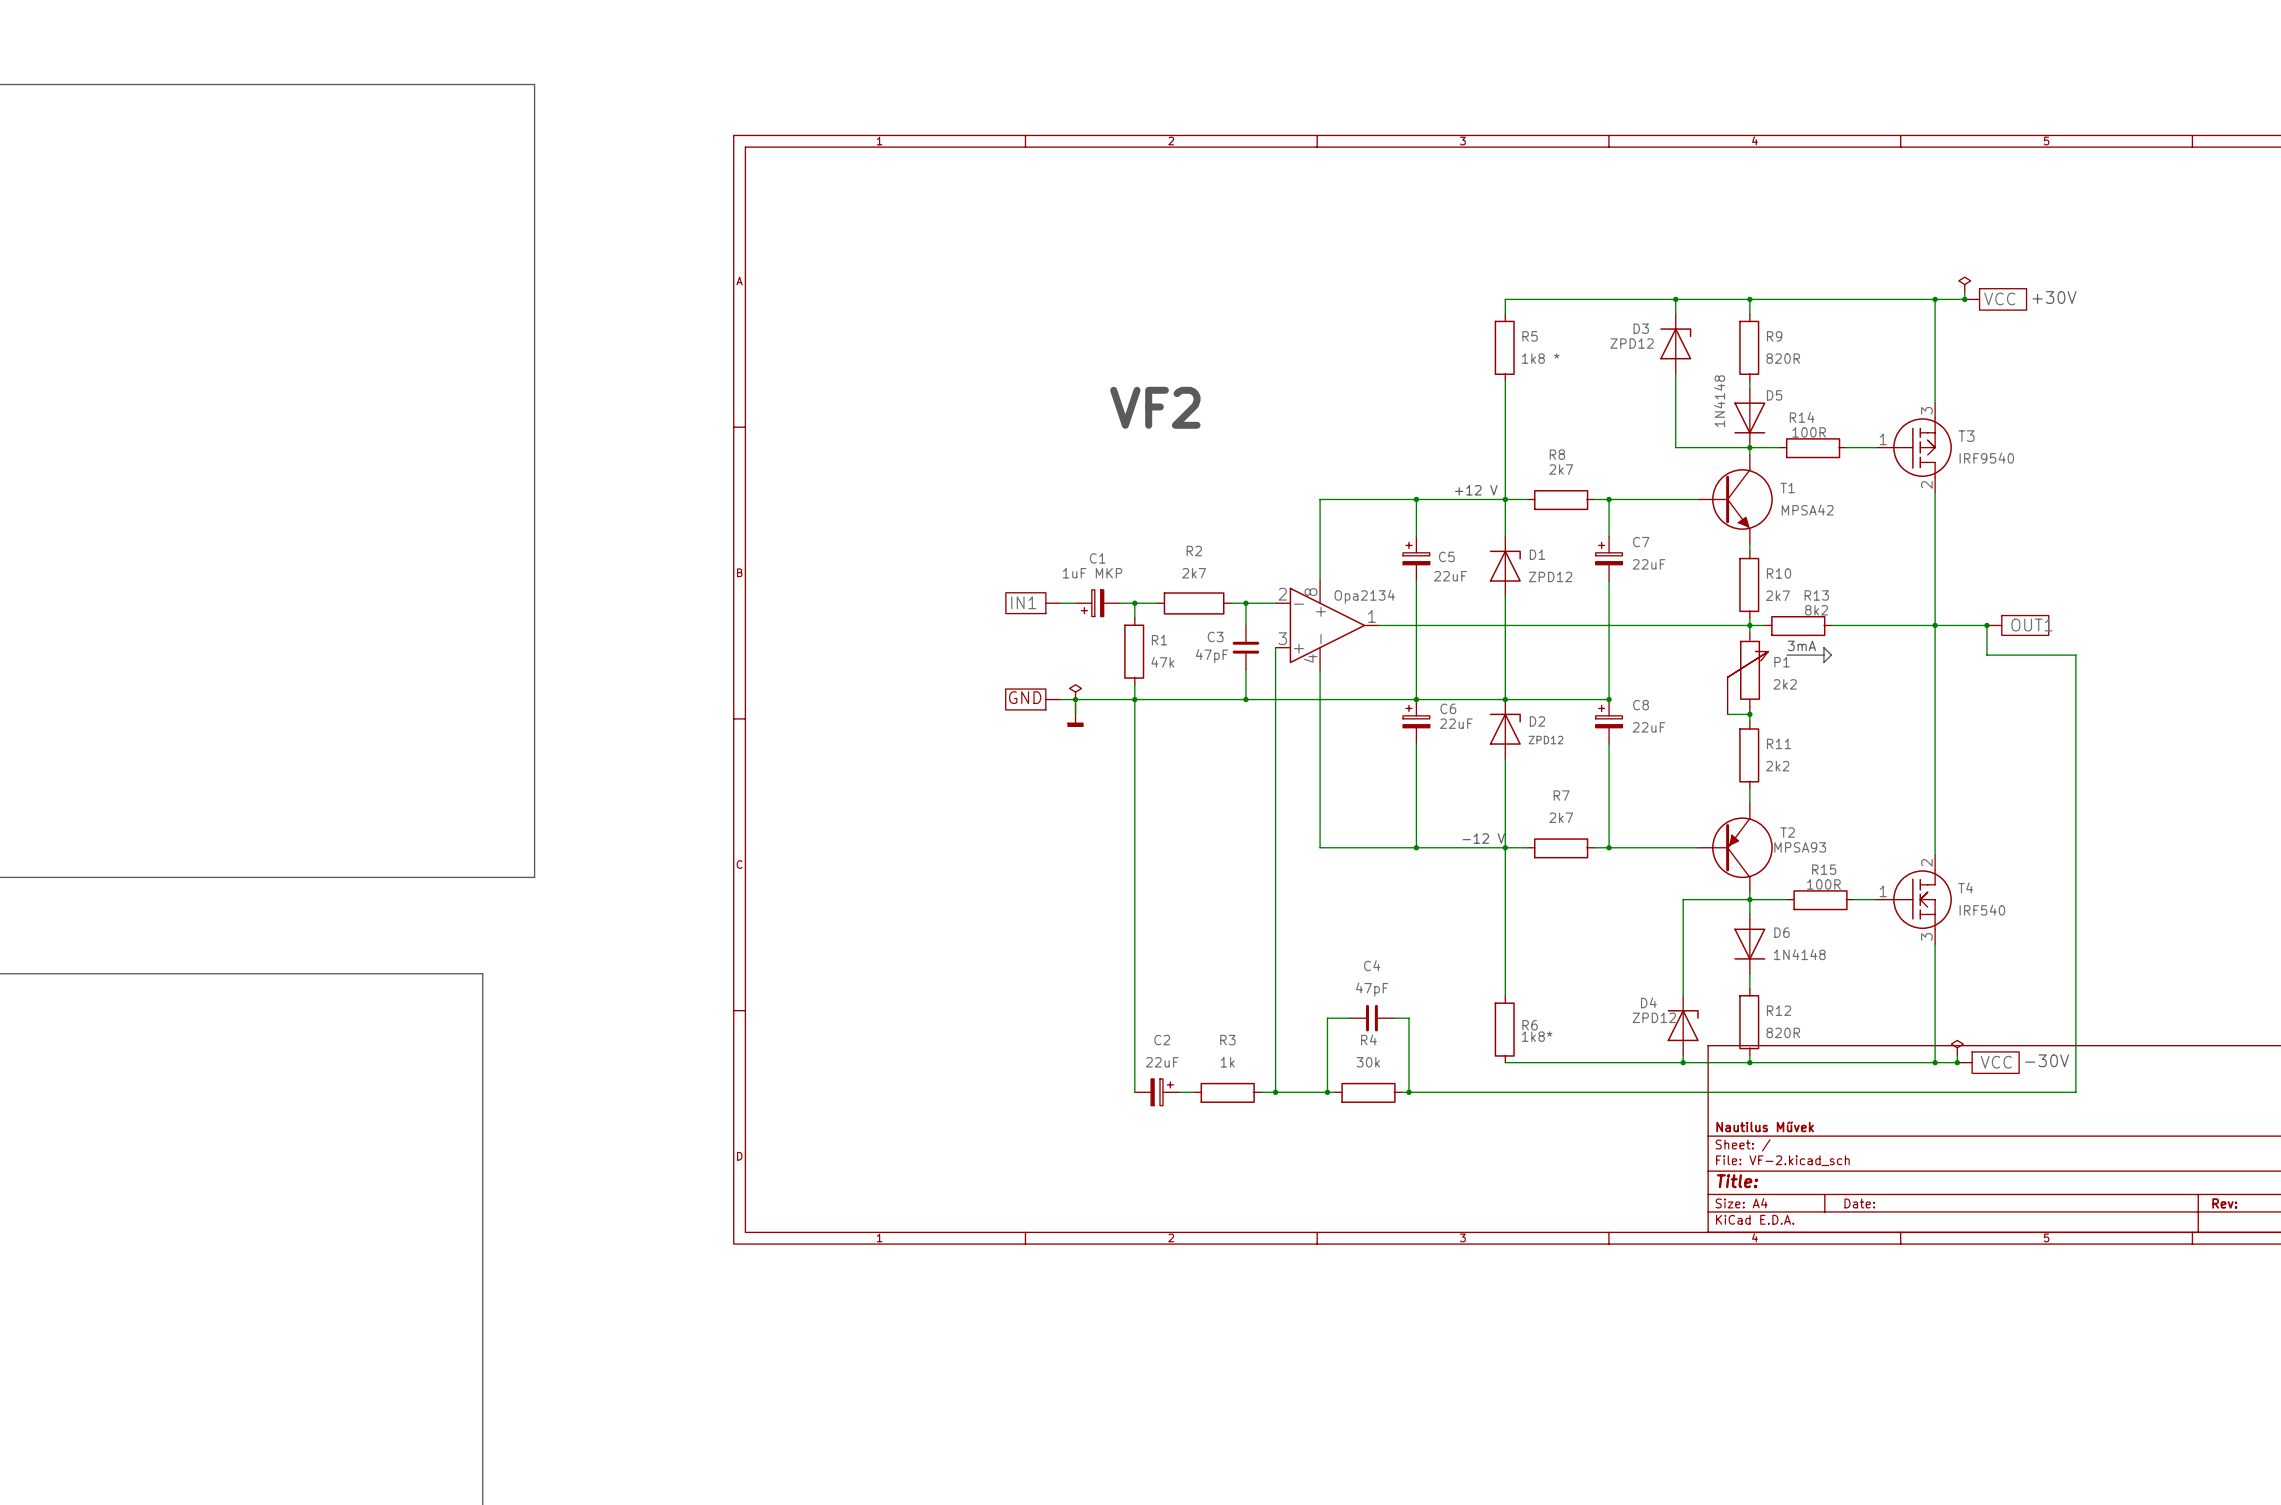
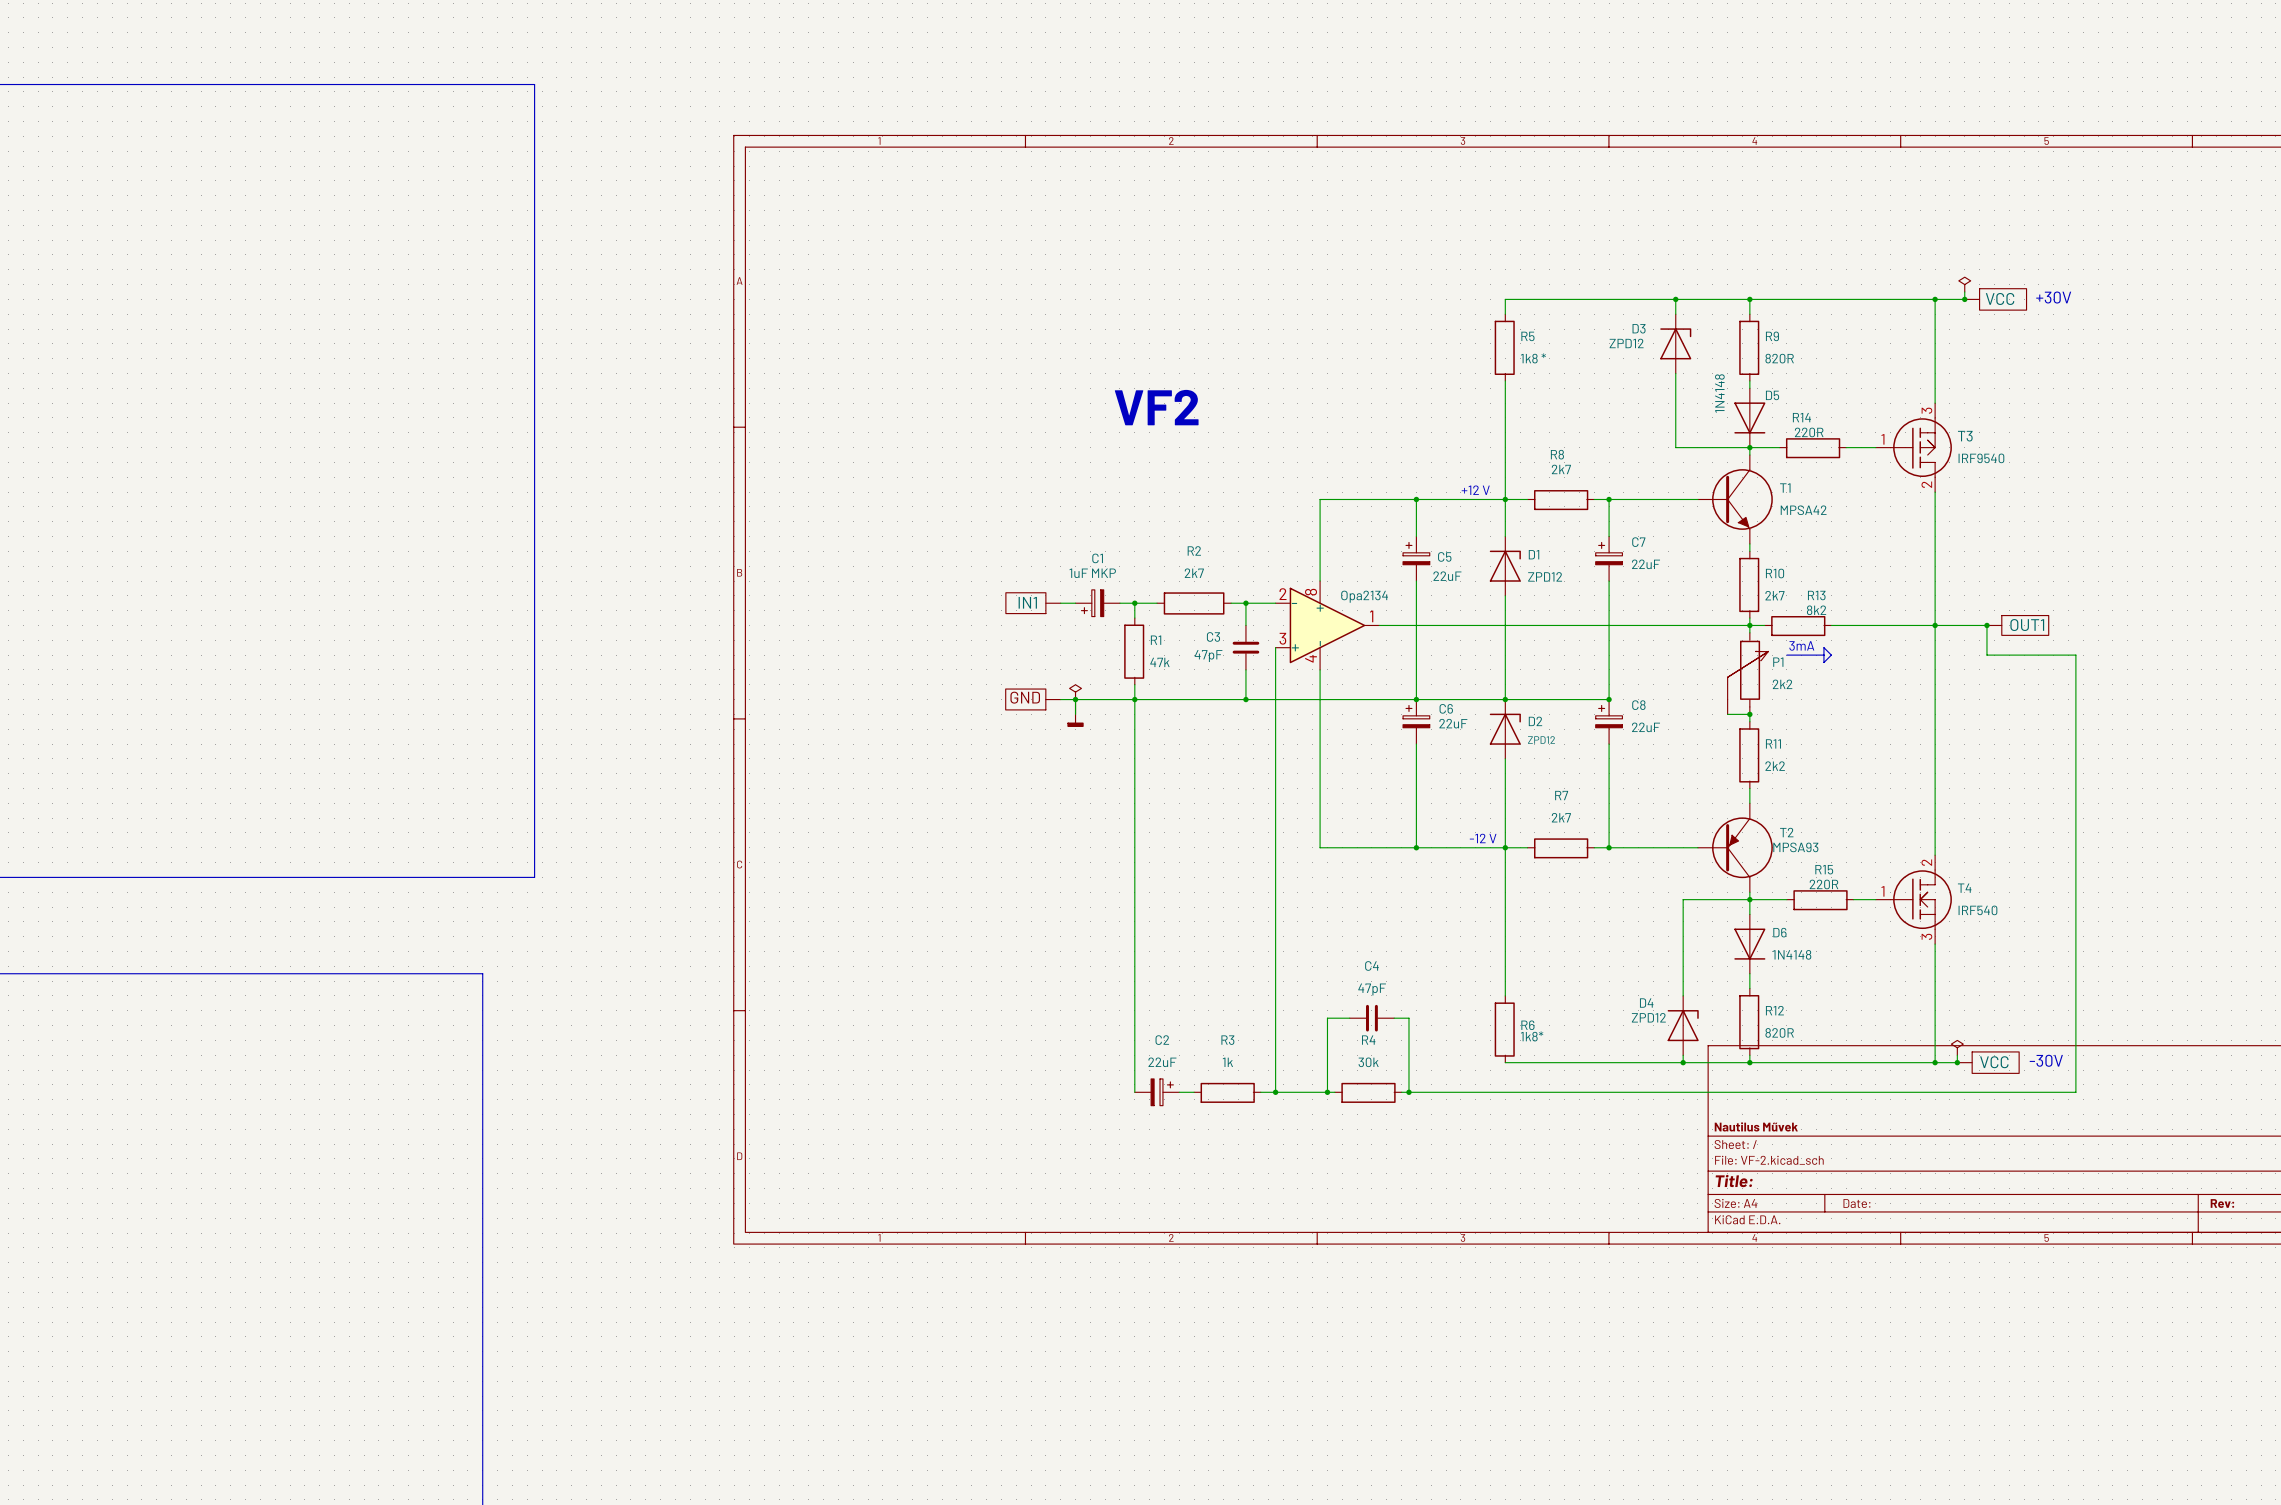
R14 value: 100R (1809, 432) -> 220R (1809, 432)
R15 value: 100R (1823, 884) -> 220R (1824, 884)

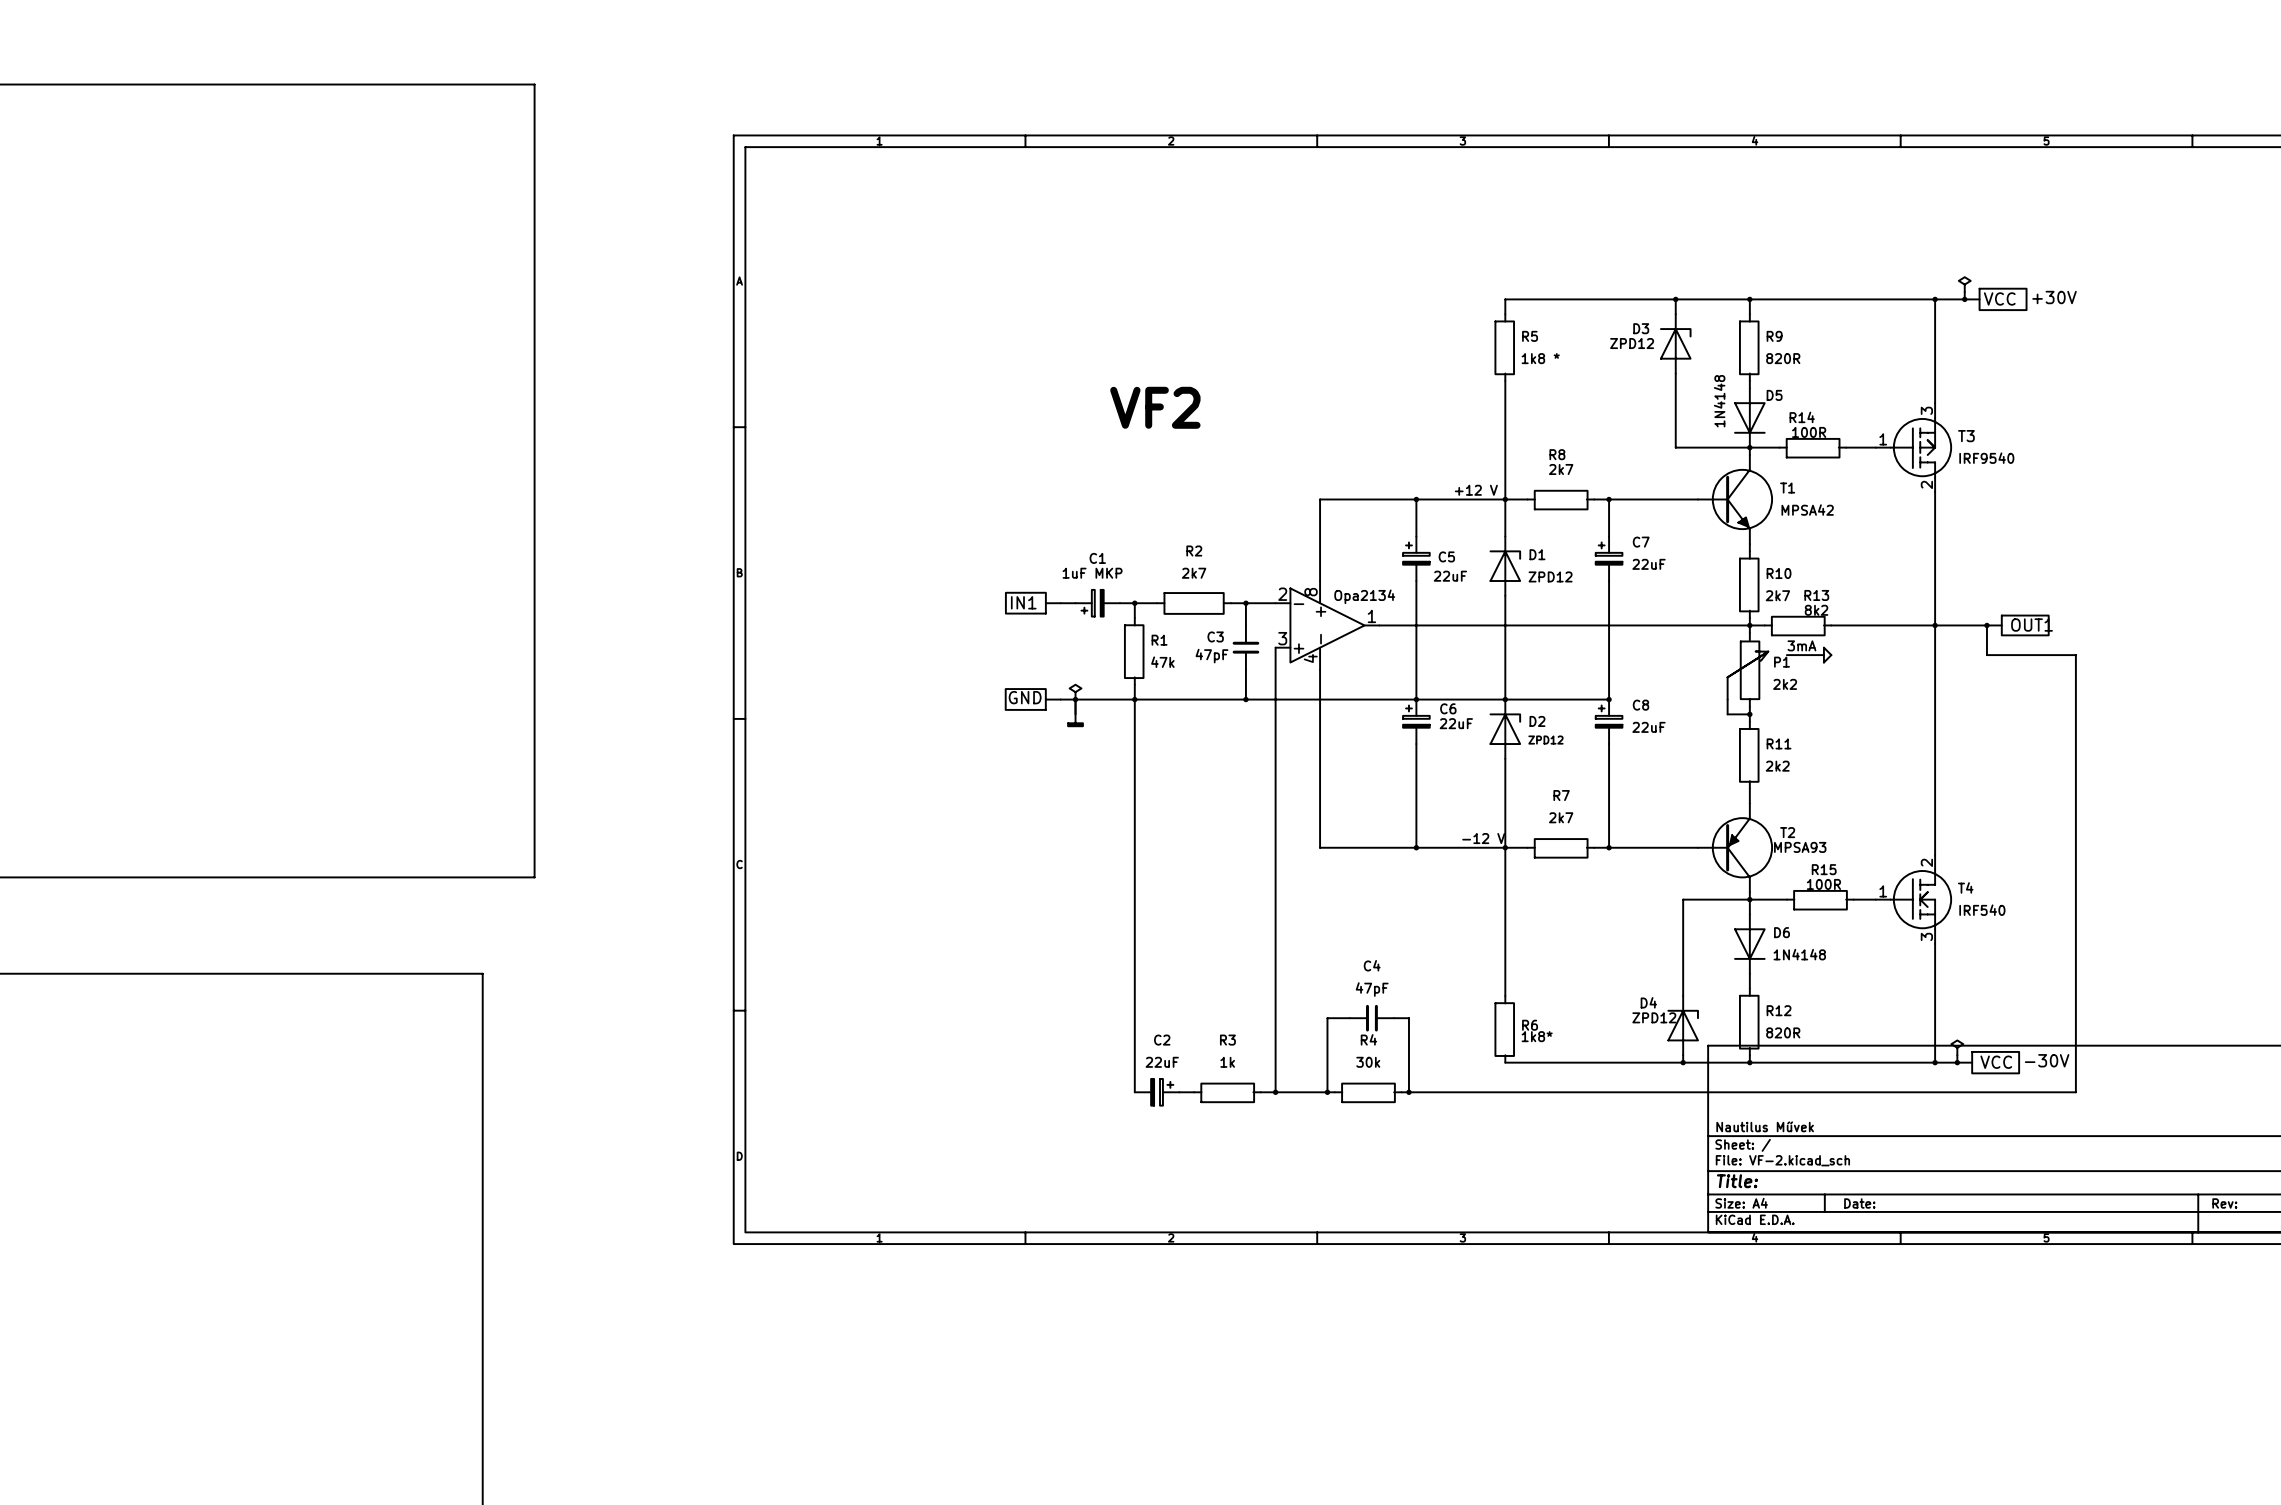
R14 value: 220R (1809, 432) -> 100R (1809, 432)
R15 value: 220R (1824, 884) -> 100R (1823, 884)

